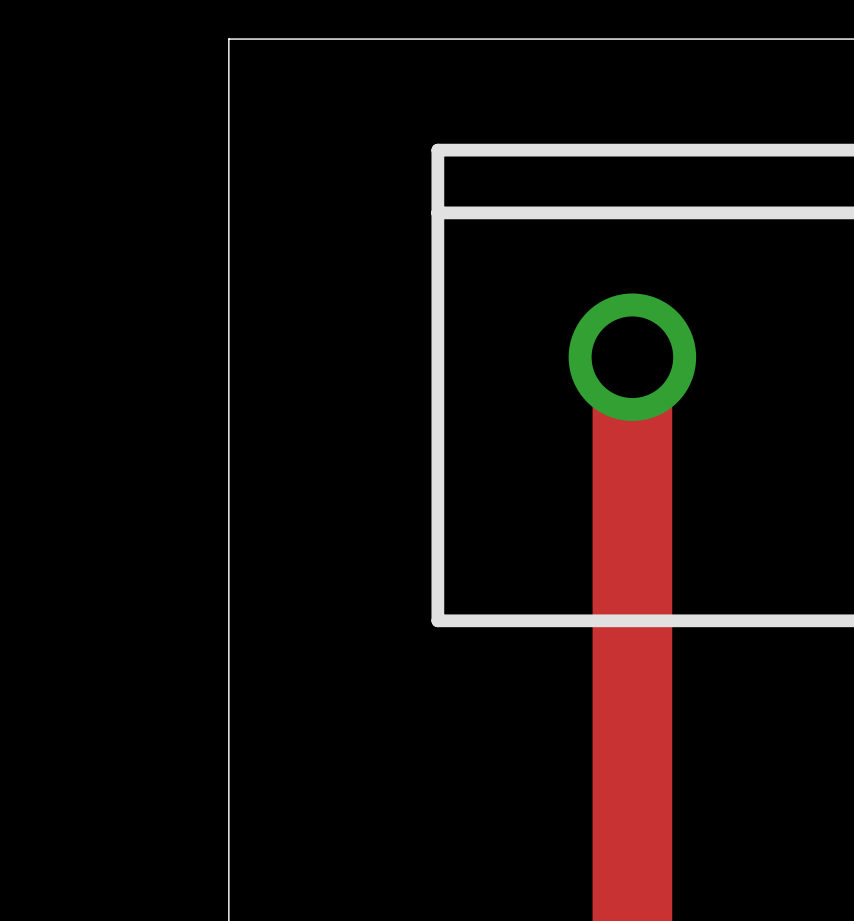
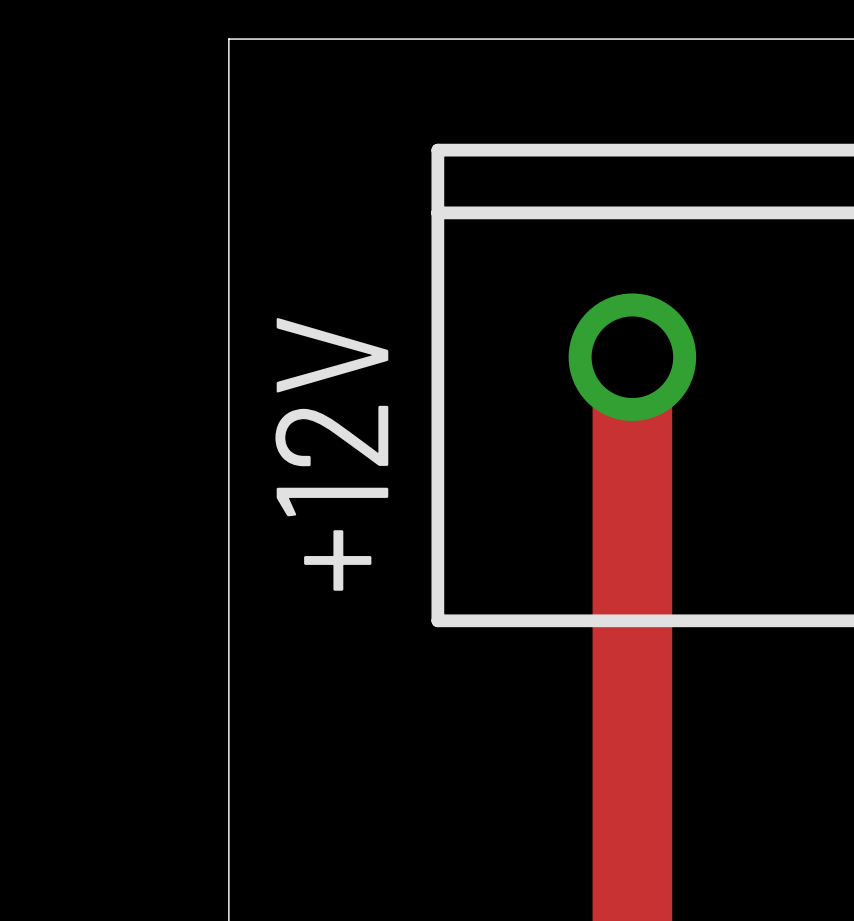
text: none -> +12V (331, 454)

